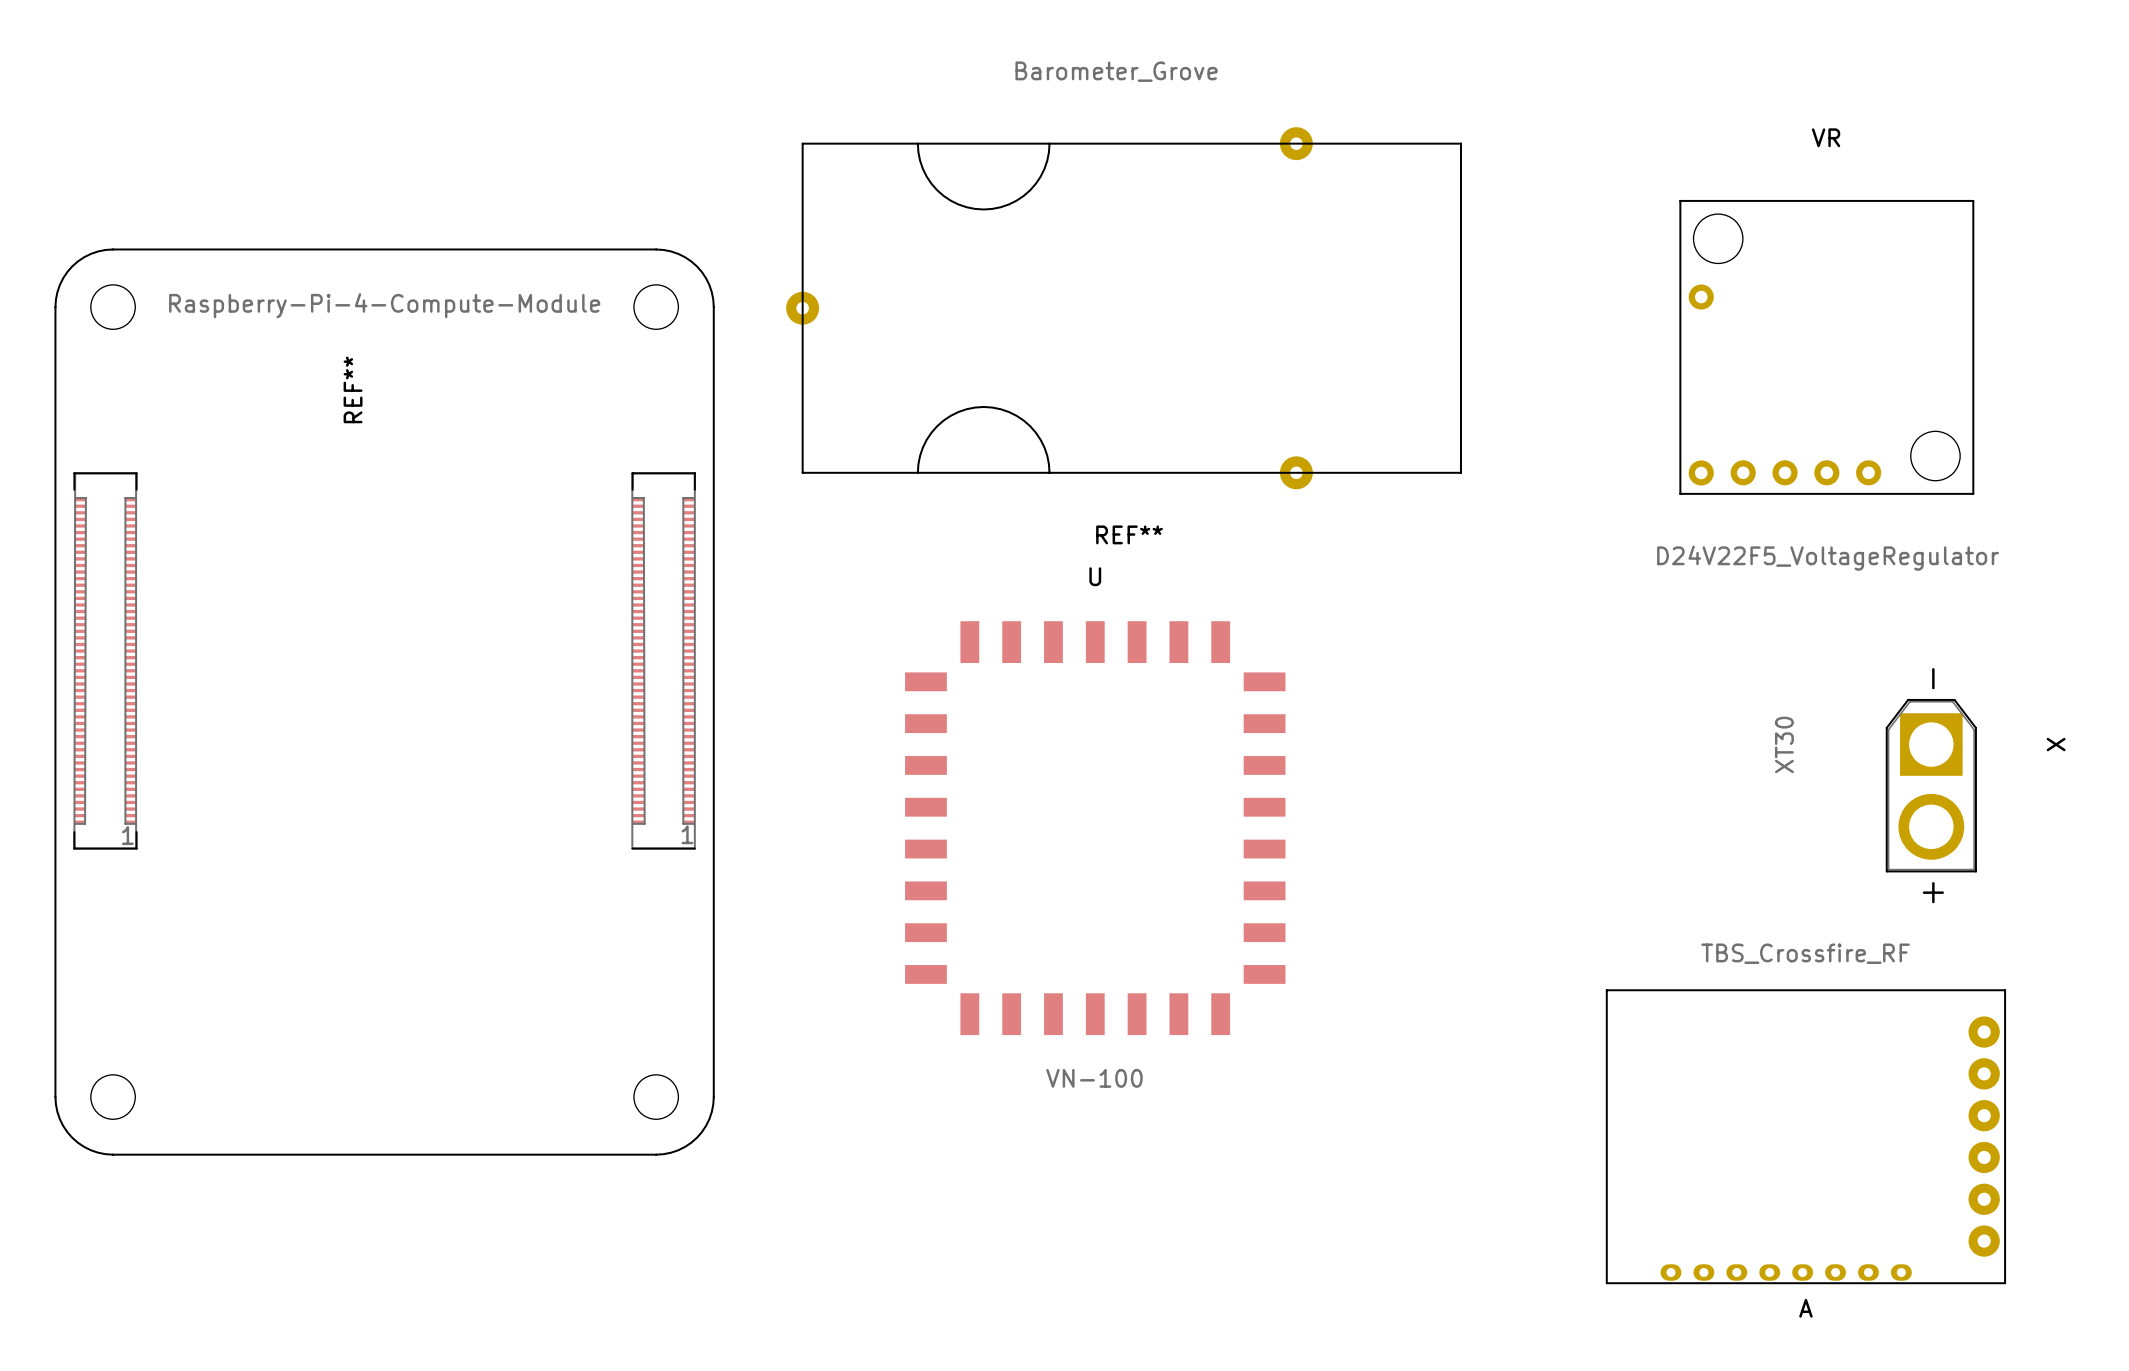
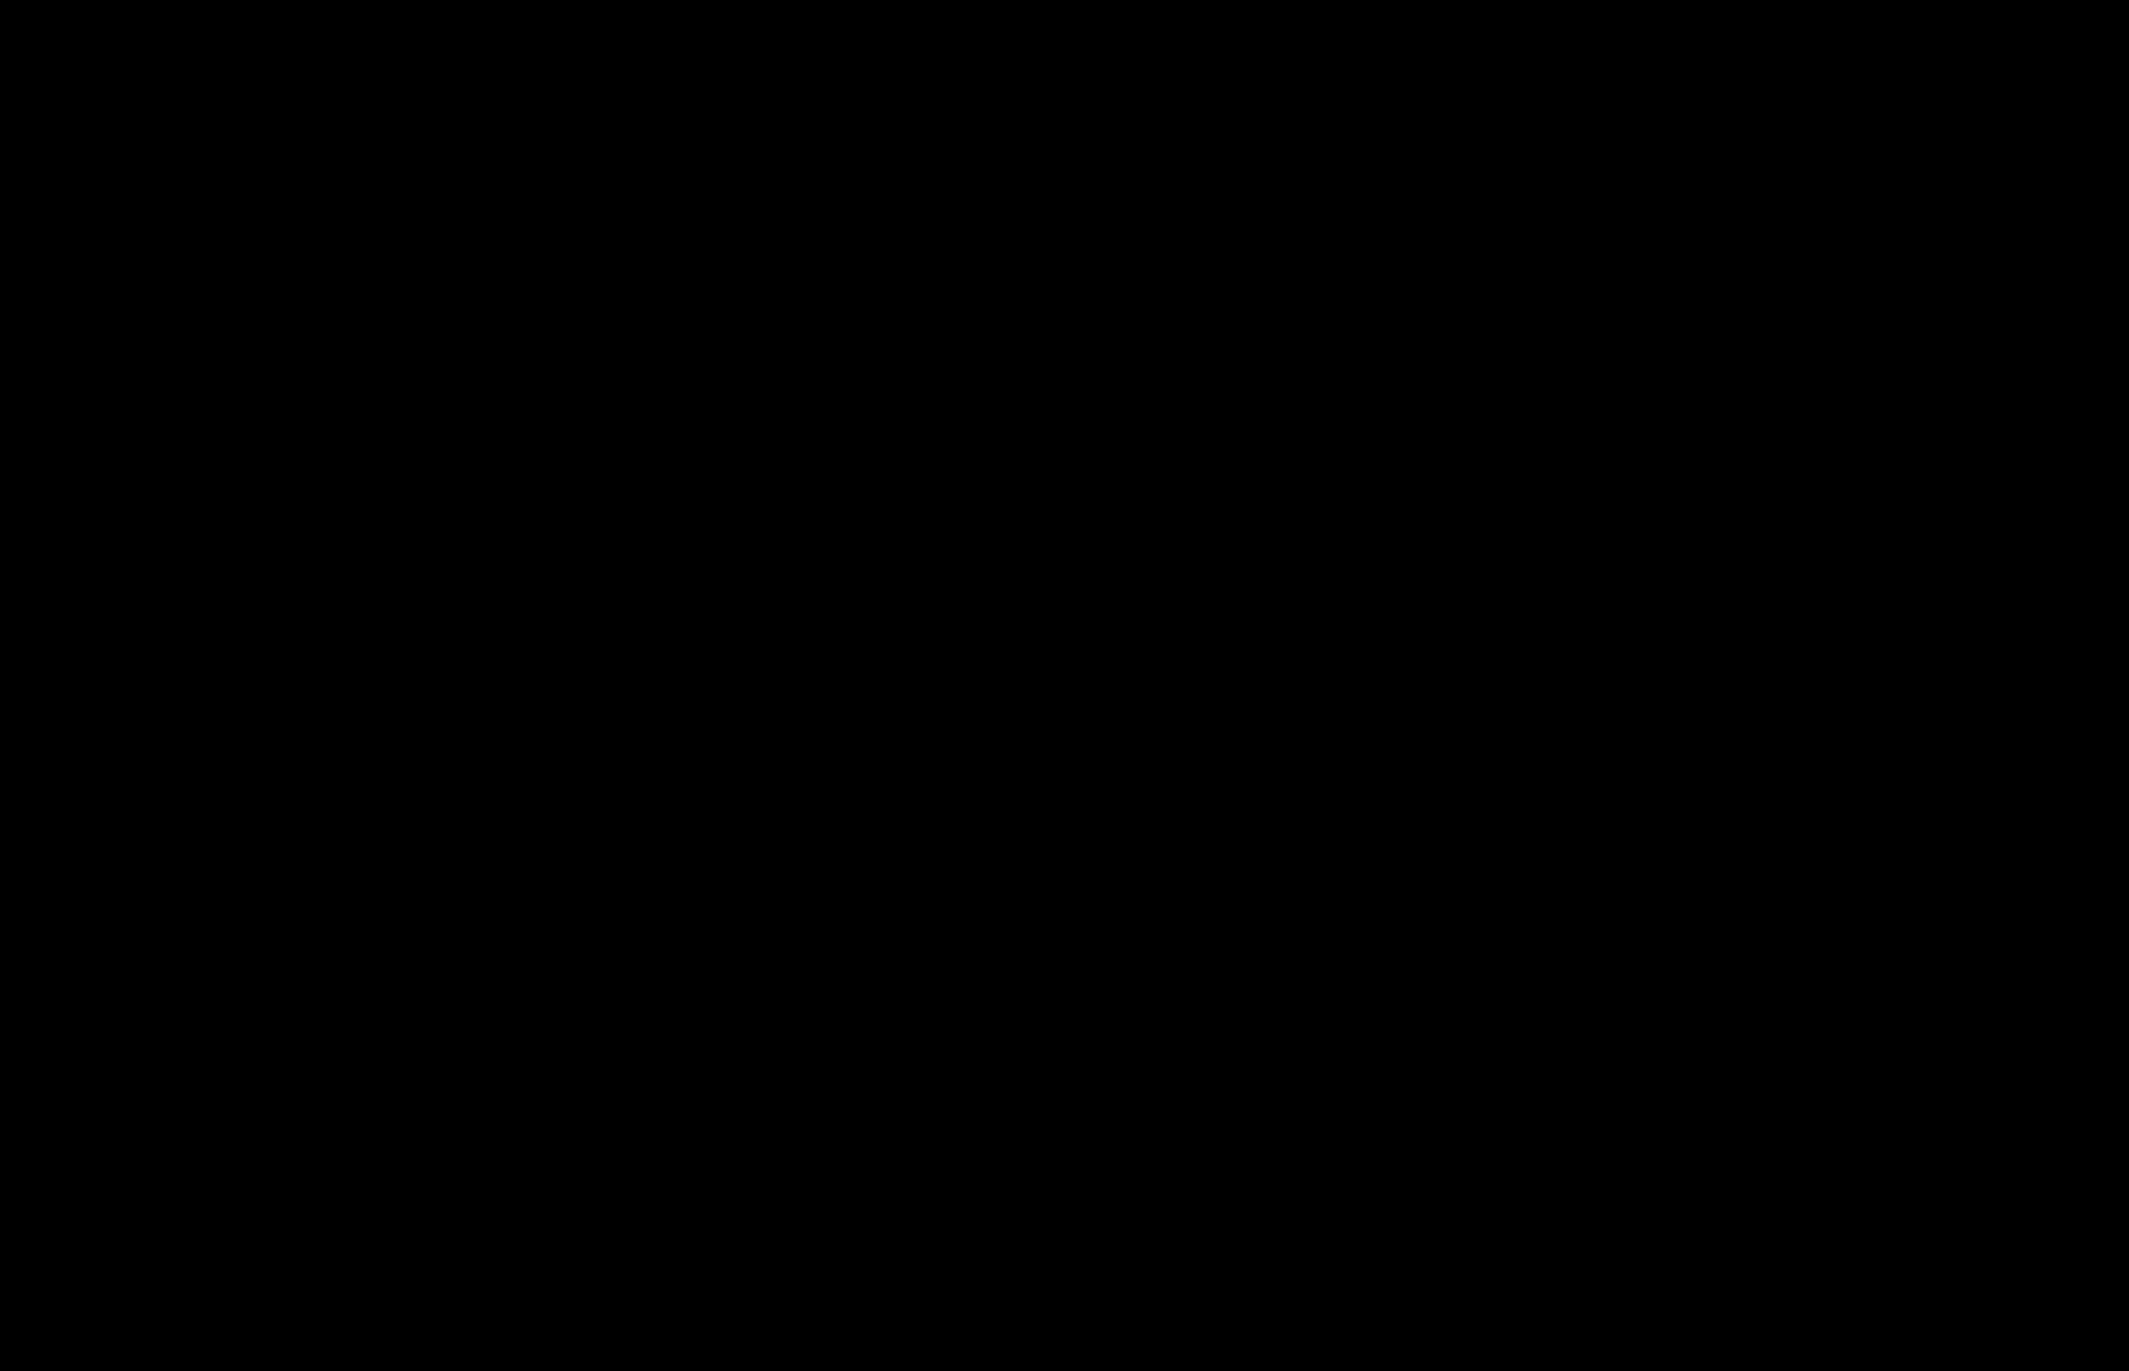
REF**: Barometer_Grove (1124, 308) -> none
VR: D24V22F5_VoltageRegulator (1826, 347) -> none
REF**: Raspberry-Pi-4-Compute-Module (384, 702) -> none
X: XT30 (1931, 785) -> none
U: VN-100 (1095, 828) -> none
A: TBS_Crossfire_RF (1805, 1136) -> none

